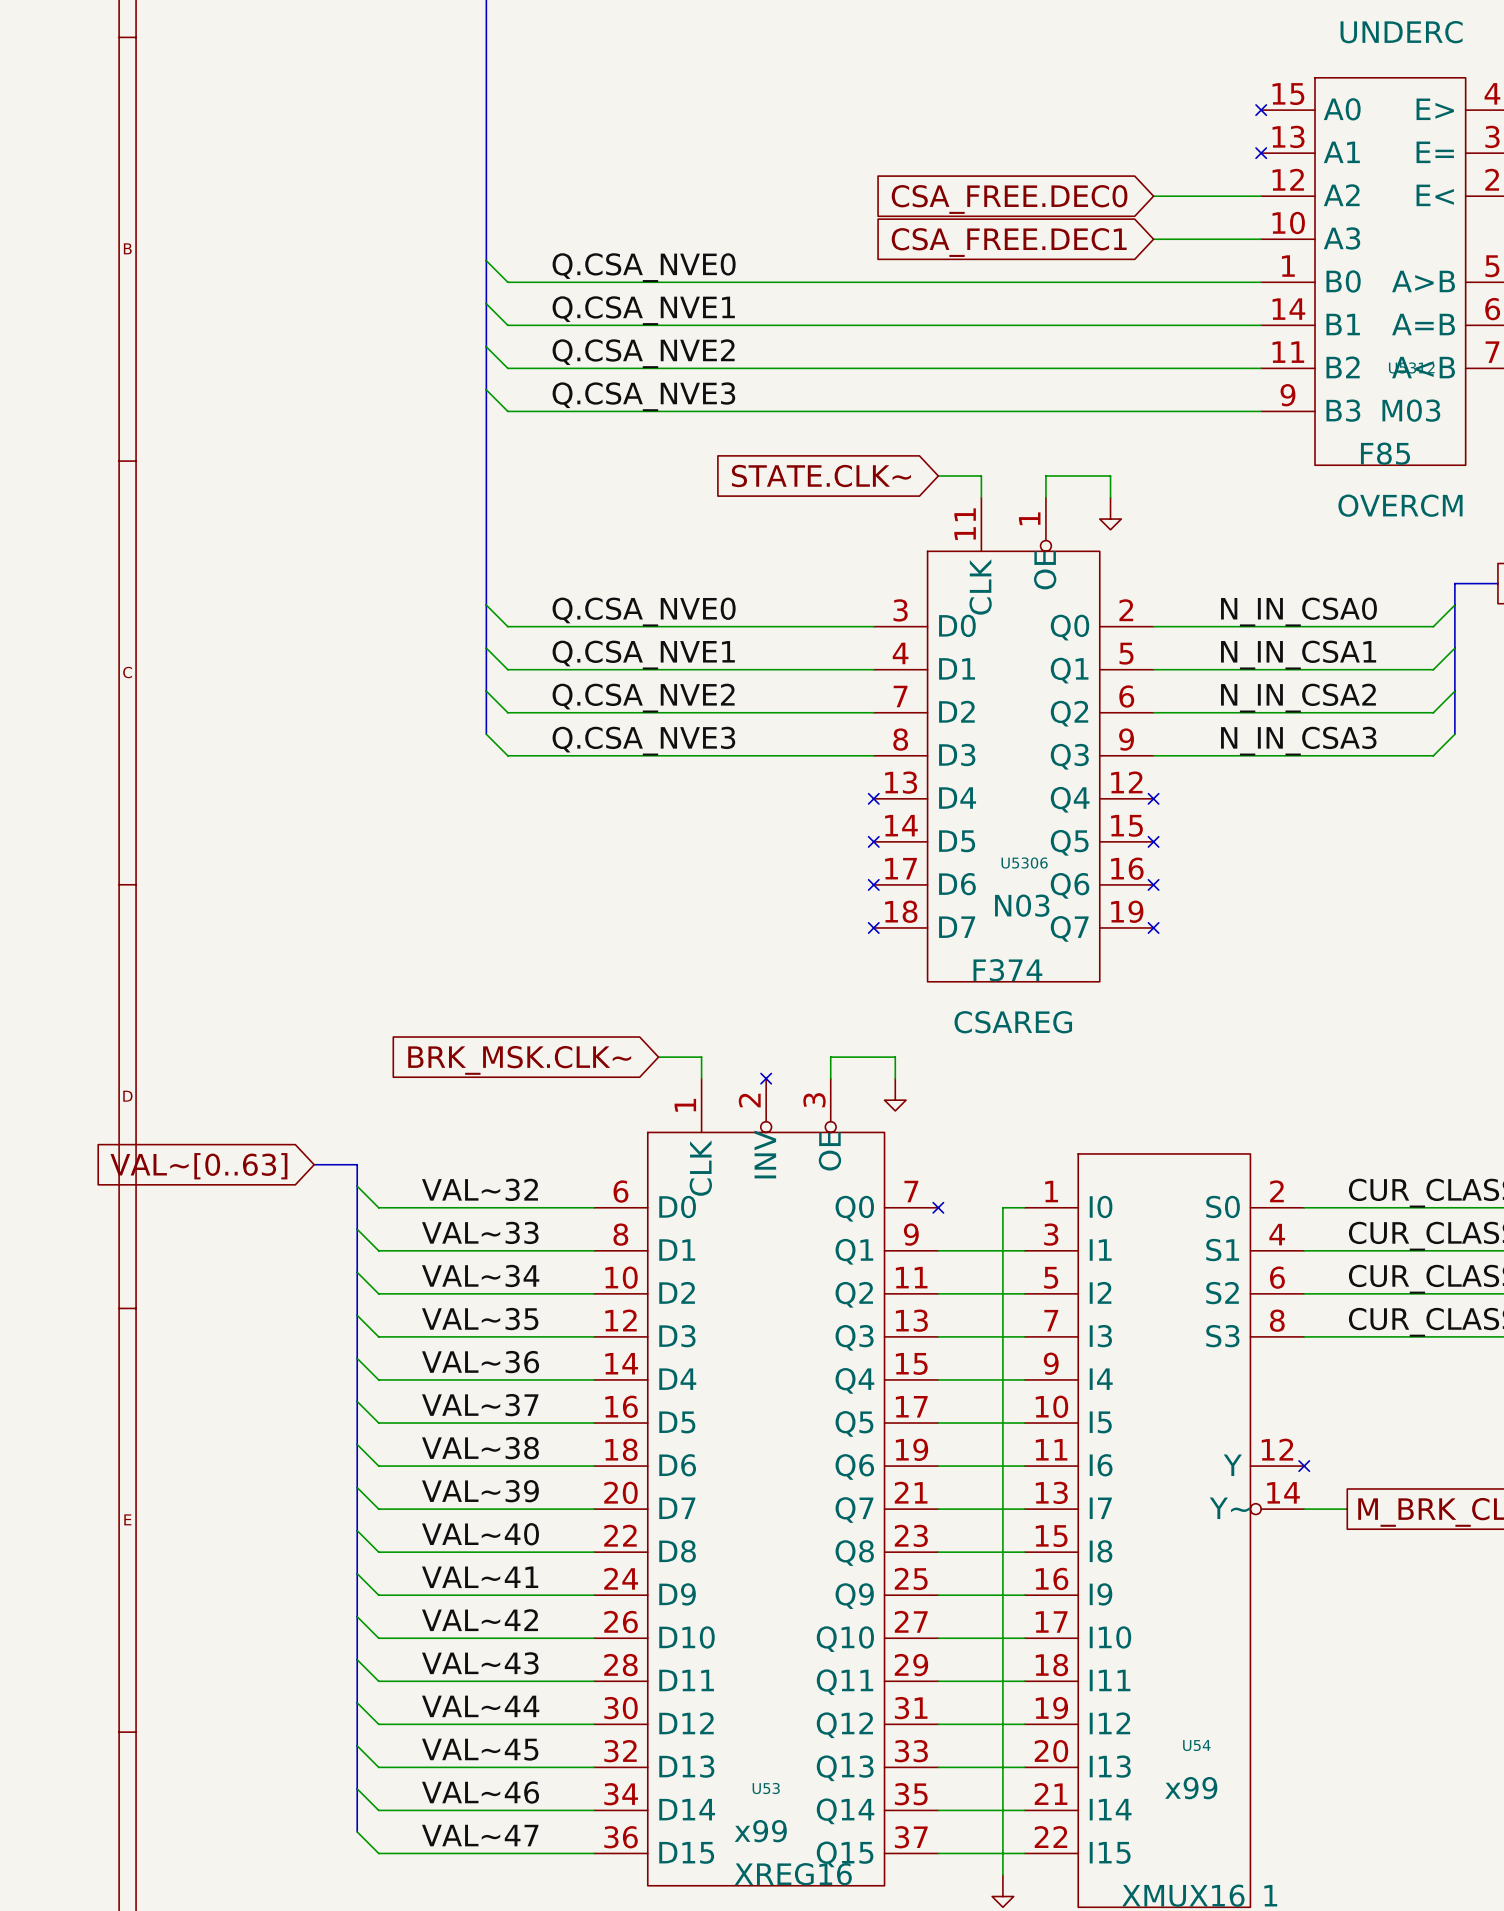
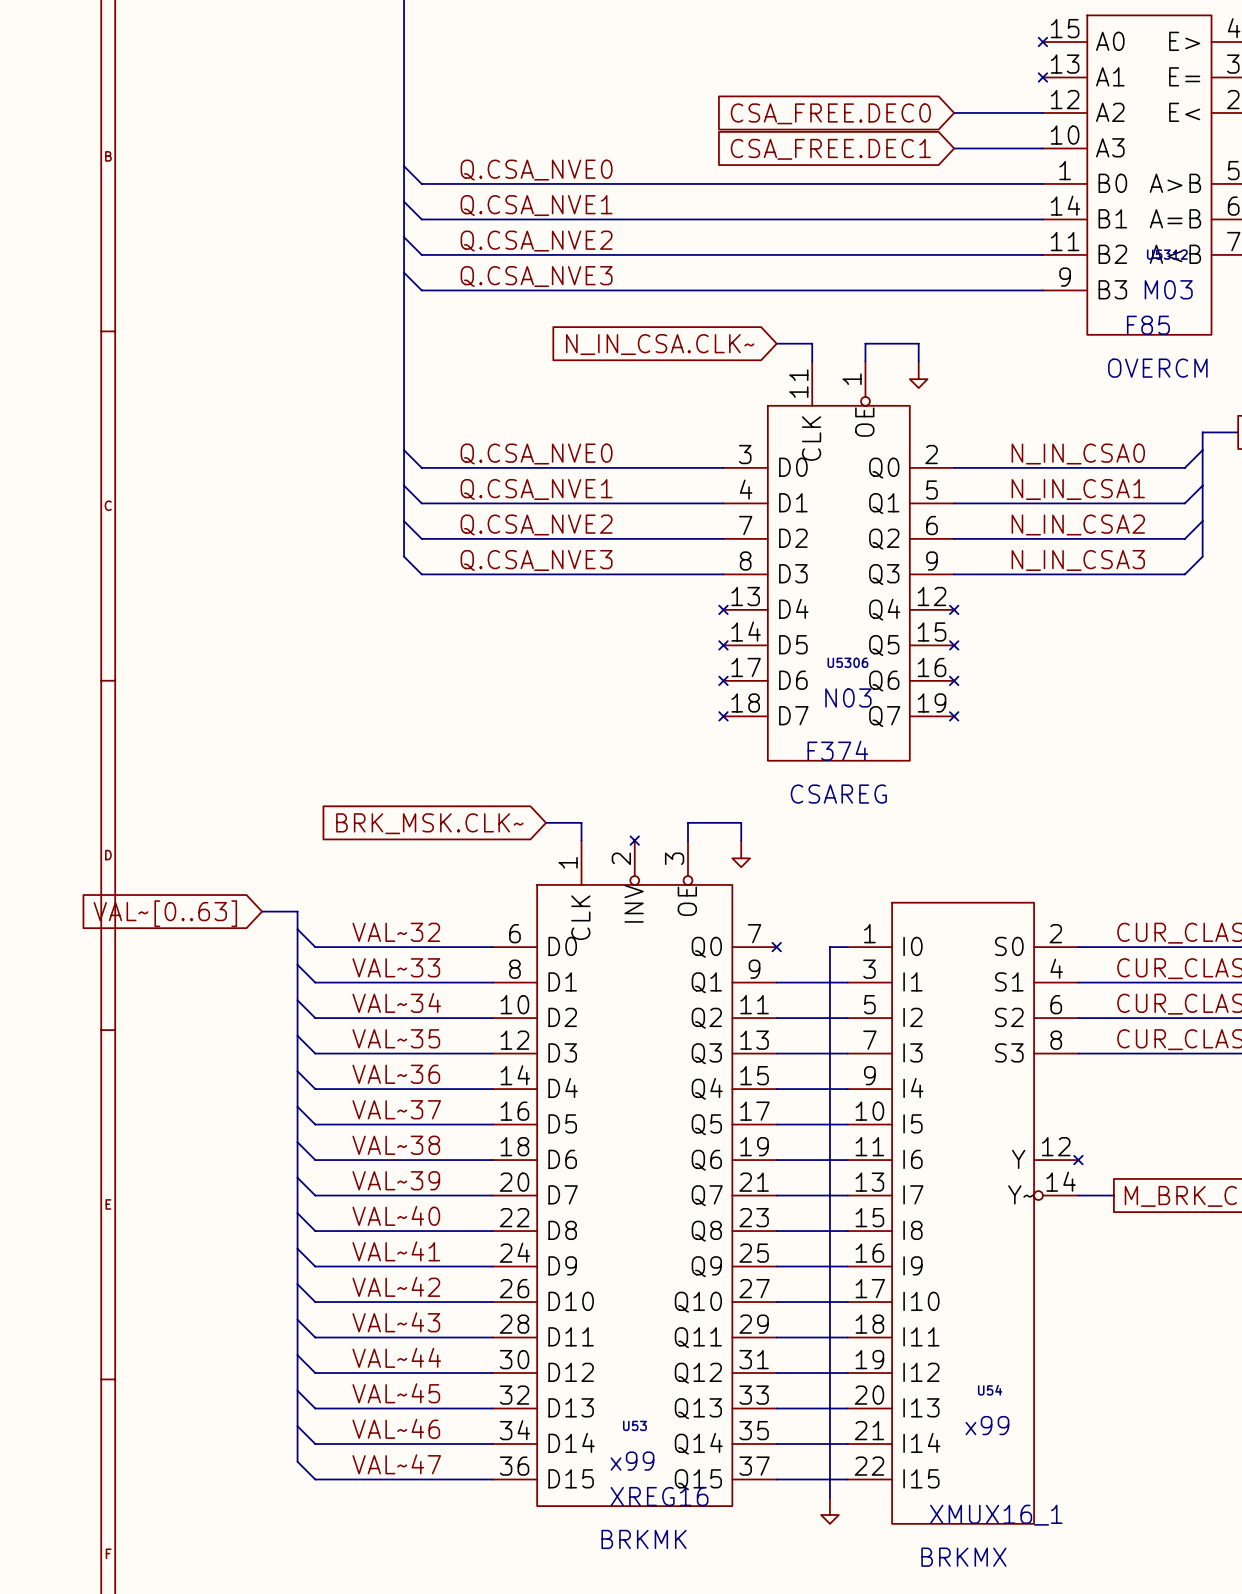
global label: STATE.CLK~ (821, 476) -> N_IN_CSA.CLK~ (660, 344)

